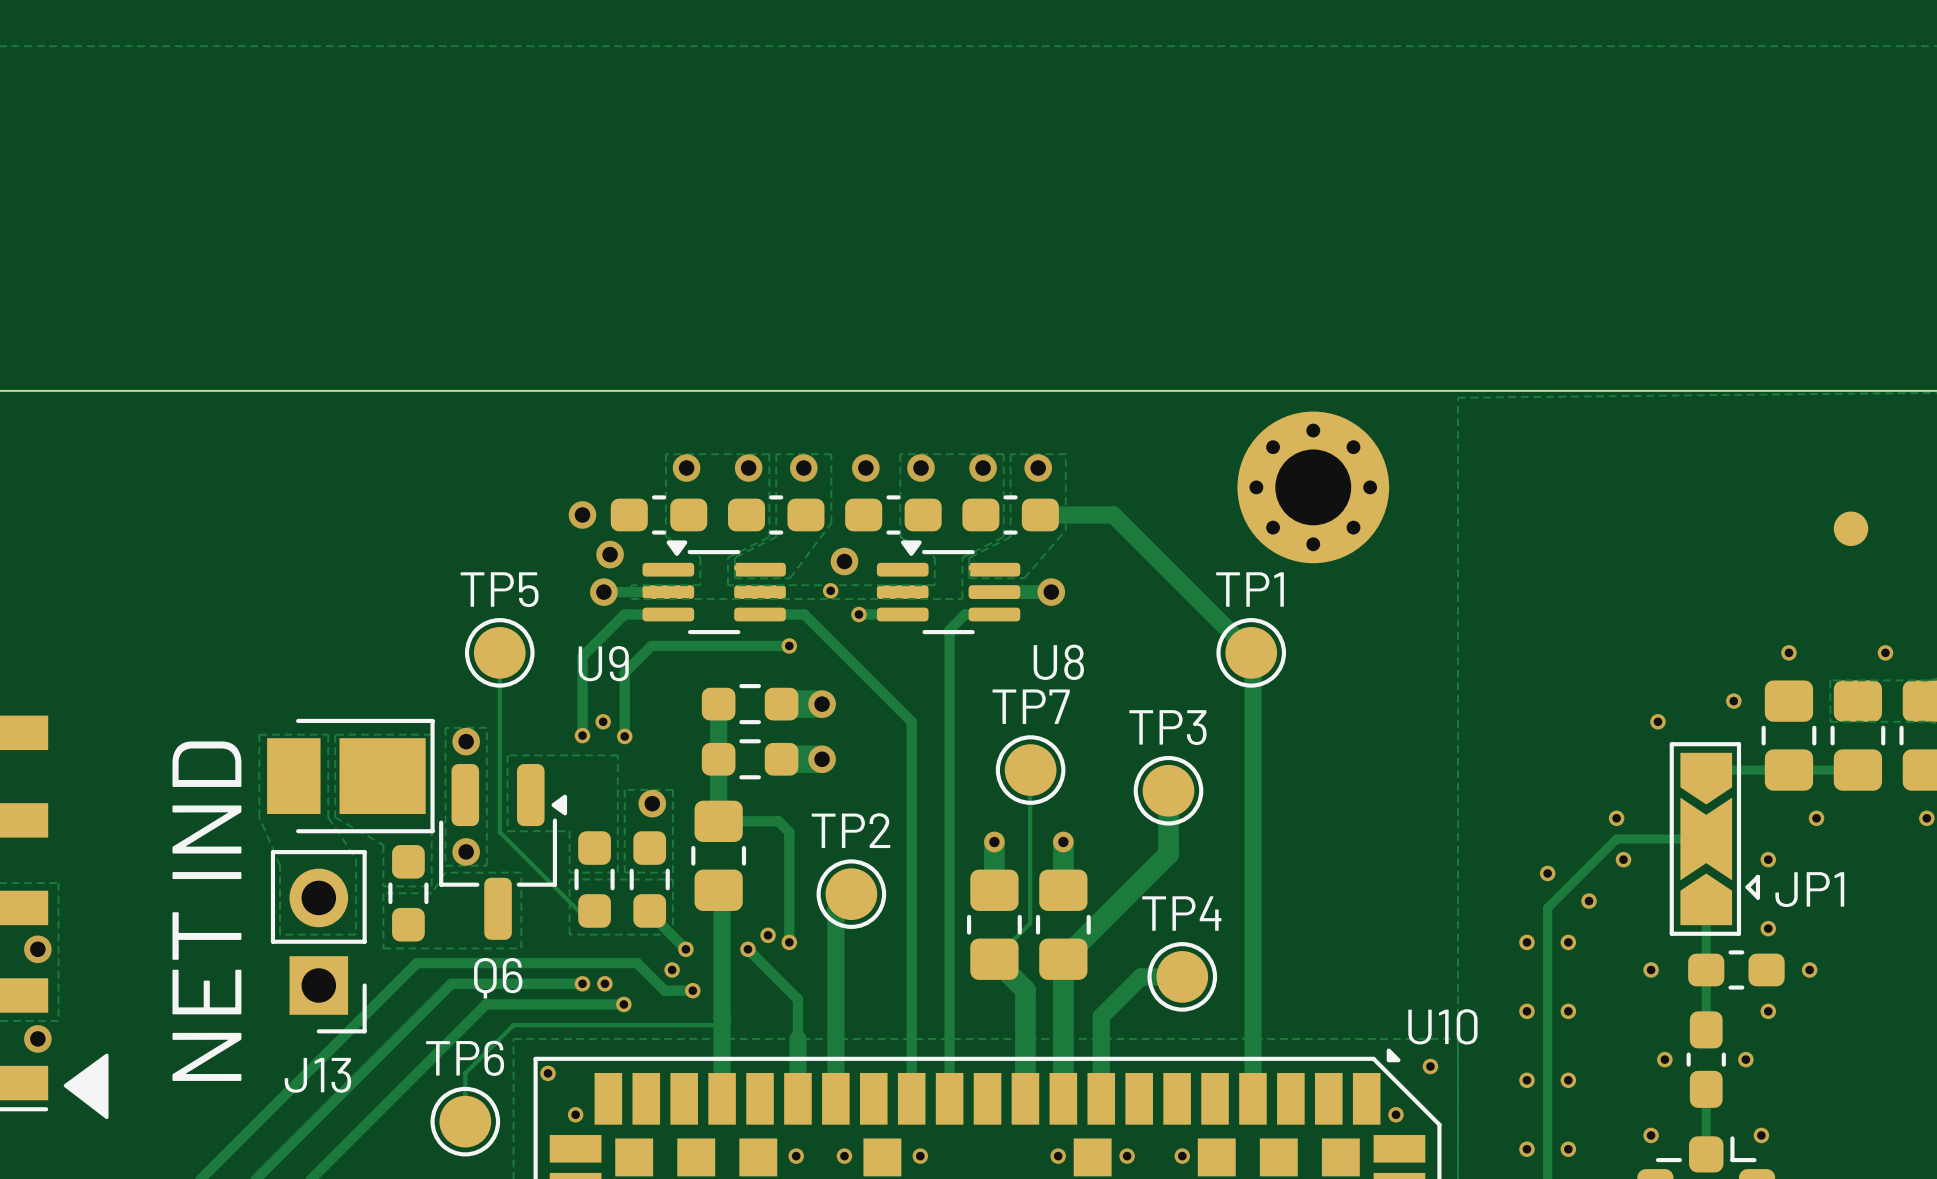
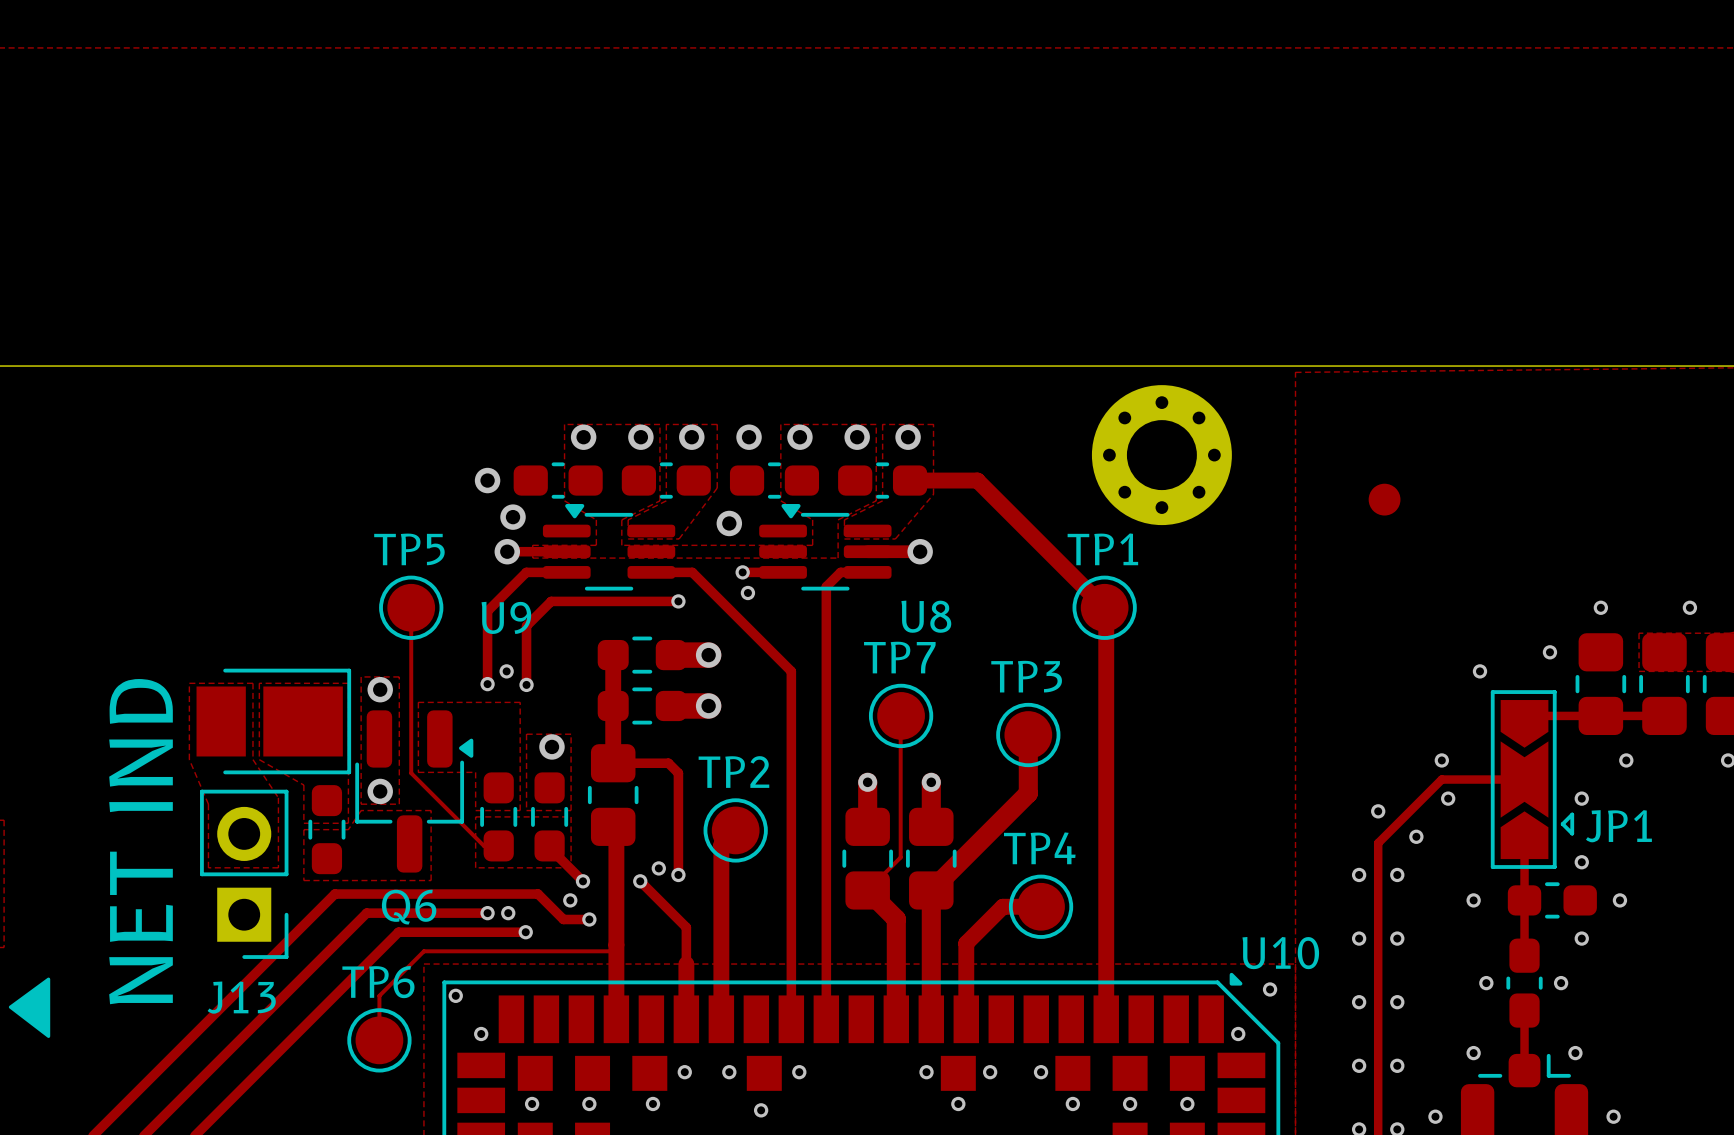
part position: (1851, 528) -> (1384, 499)
via position: (830, 590) -> (747, 592)

